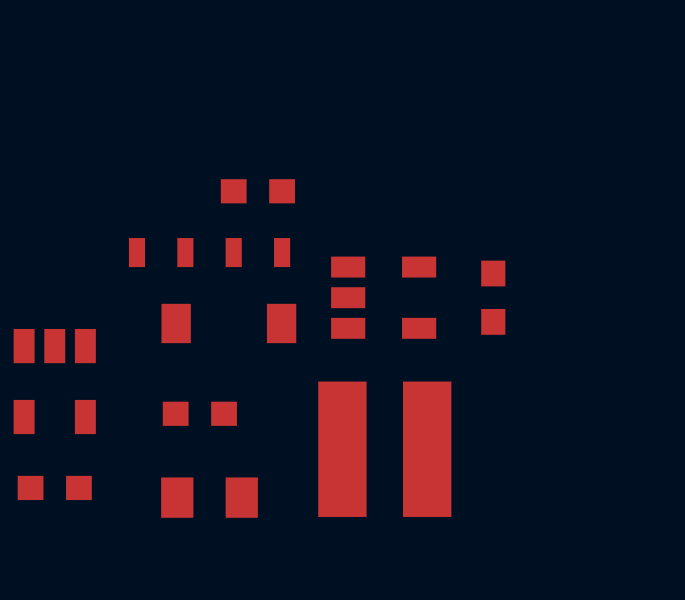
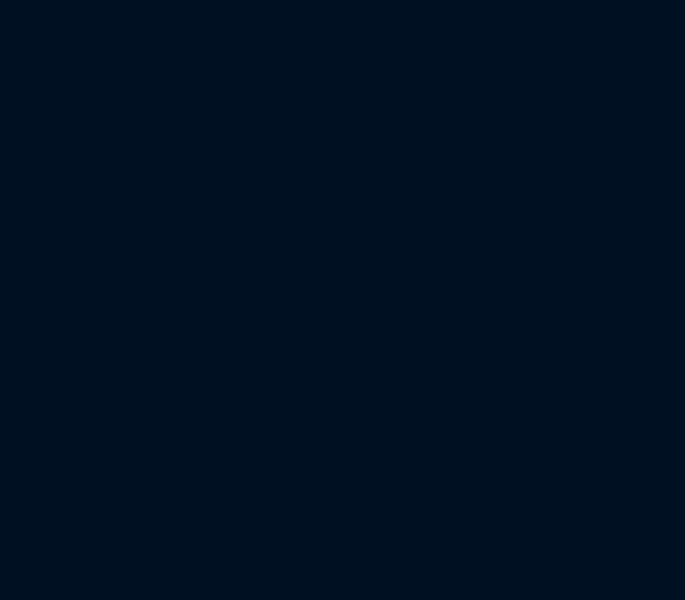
part: (257, 191) -> none
part: (161, 252) -> none
part: (257, 252) -> none
part: (383, 297) -> none
part: (493, 297) -> none
part: (228, 323) -> none
part: (54, 381) -> none
part: (199, 413) -> none
part: (384, 449) -> none
part: (54, 487) -> none
part: (209, 497) -> none

